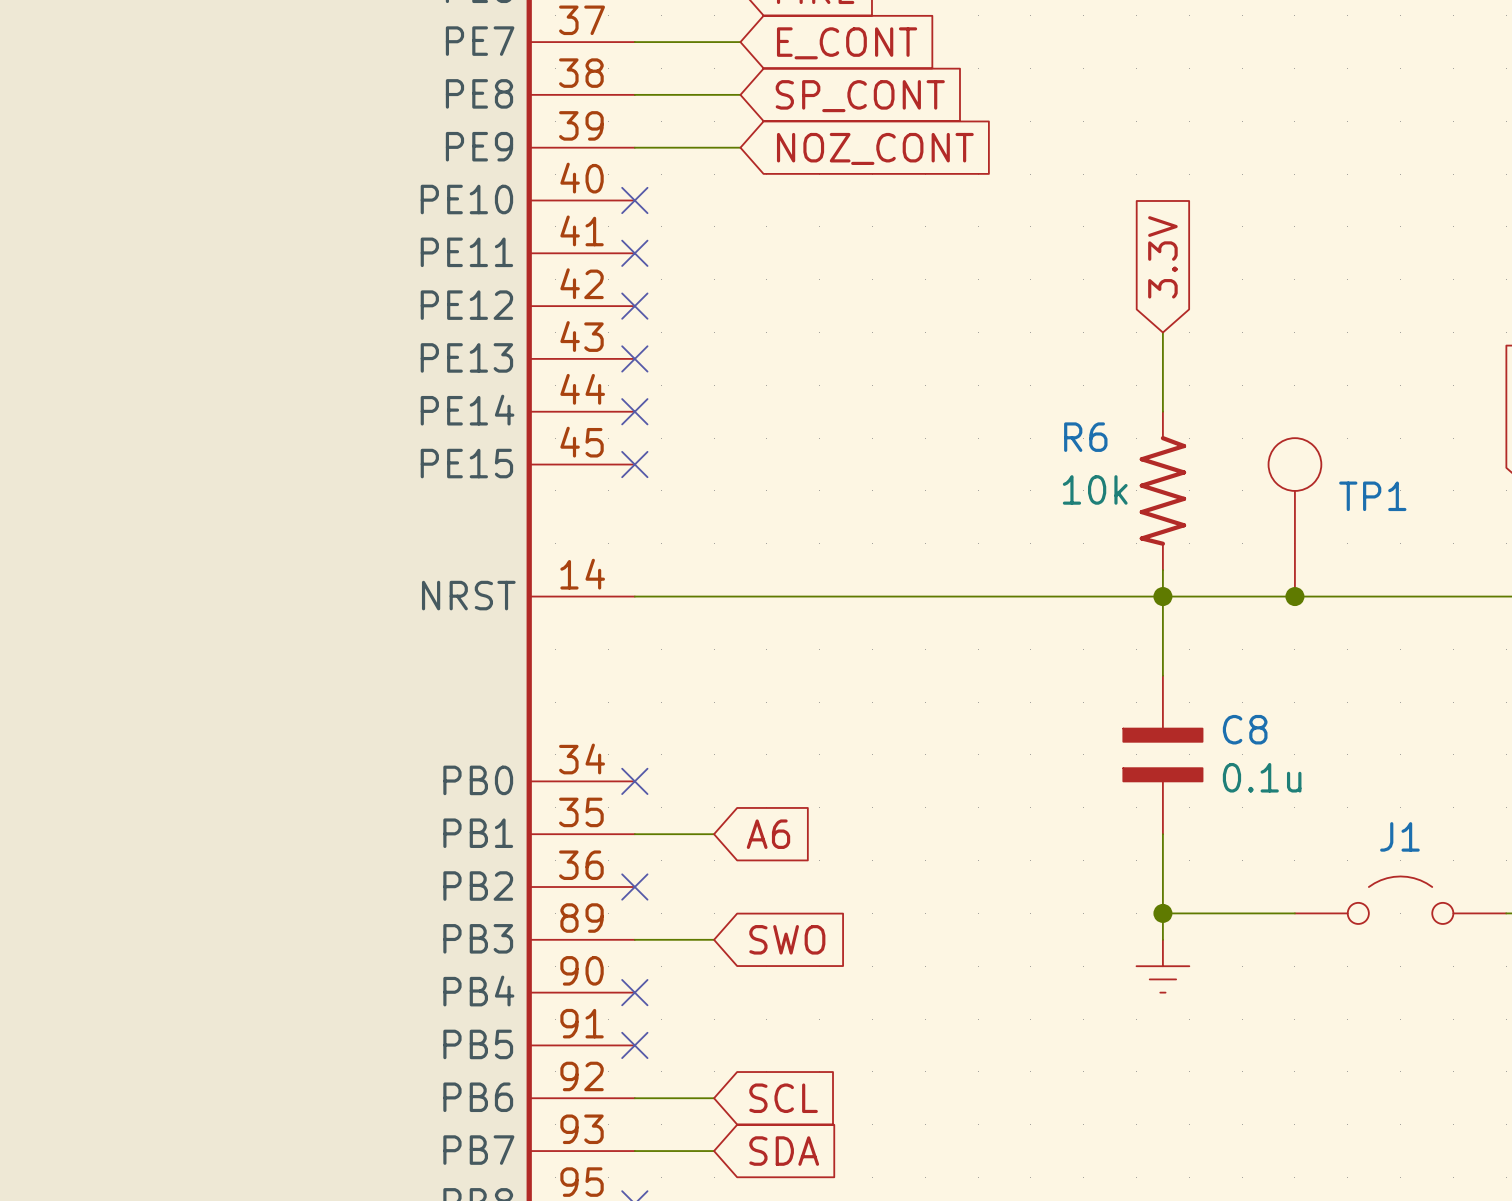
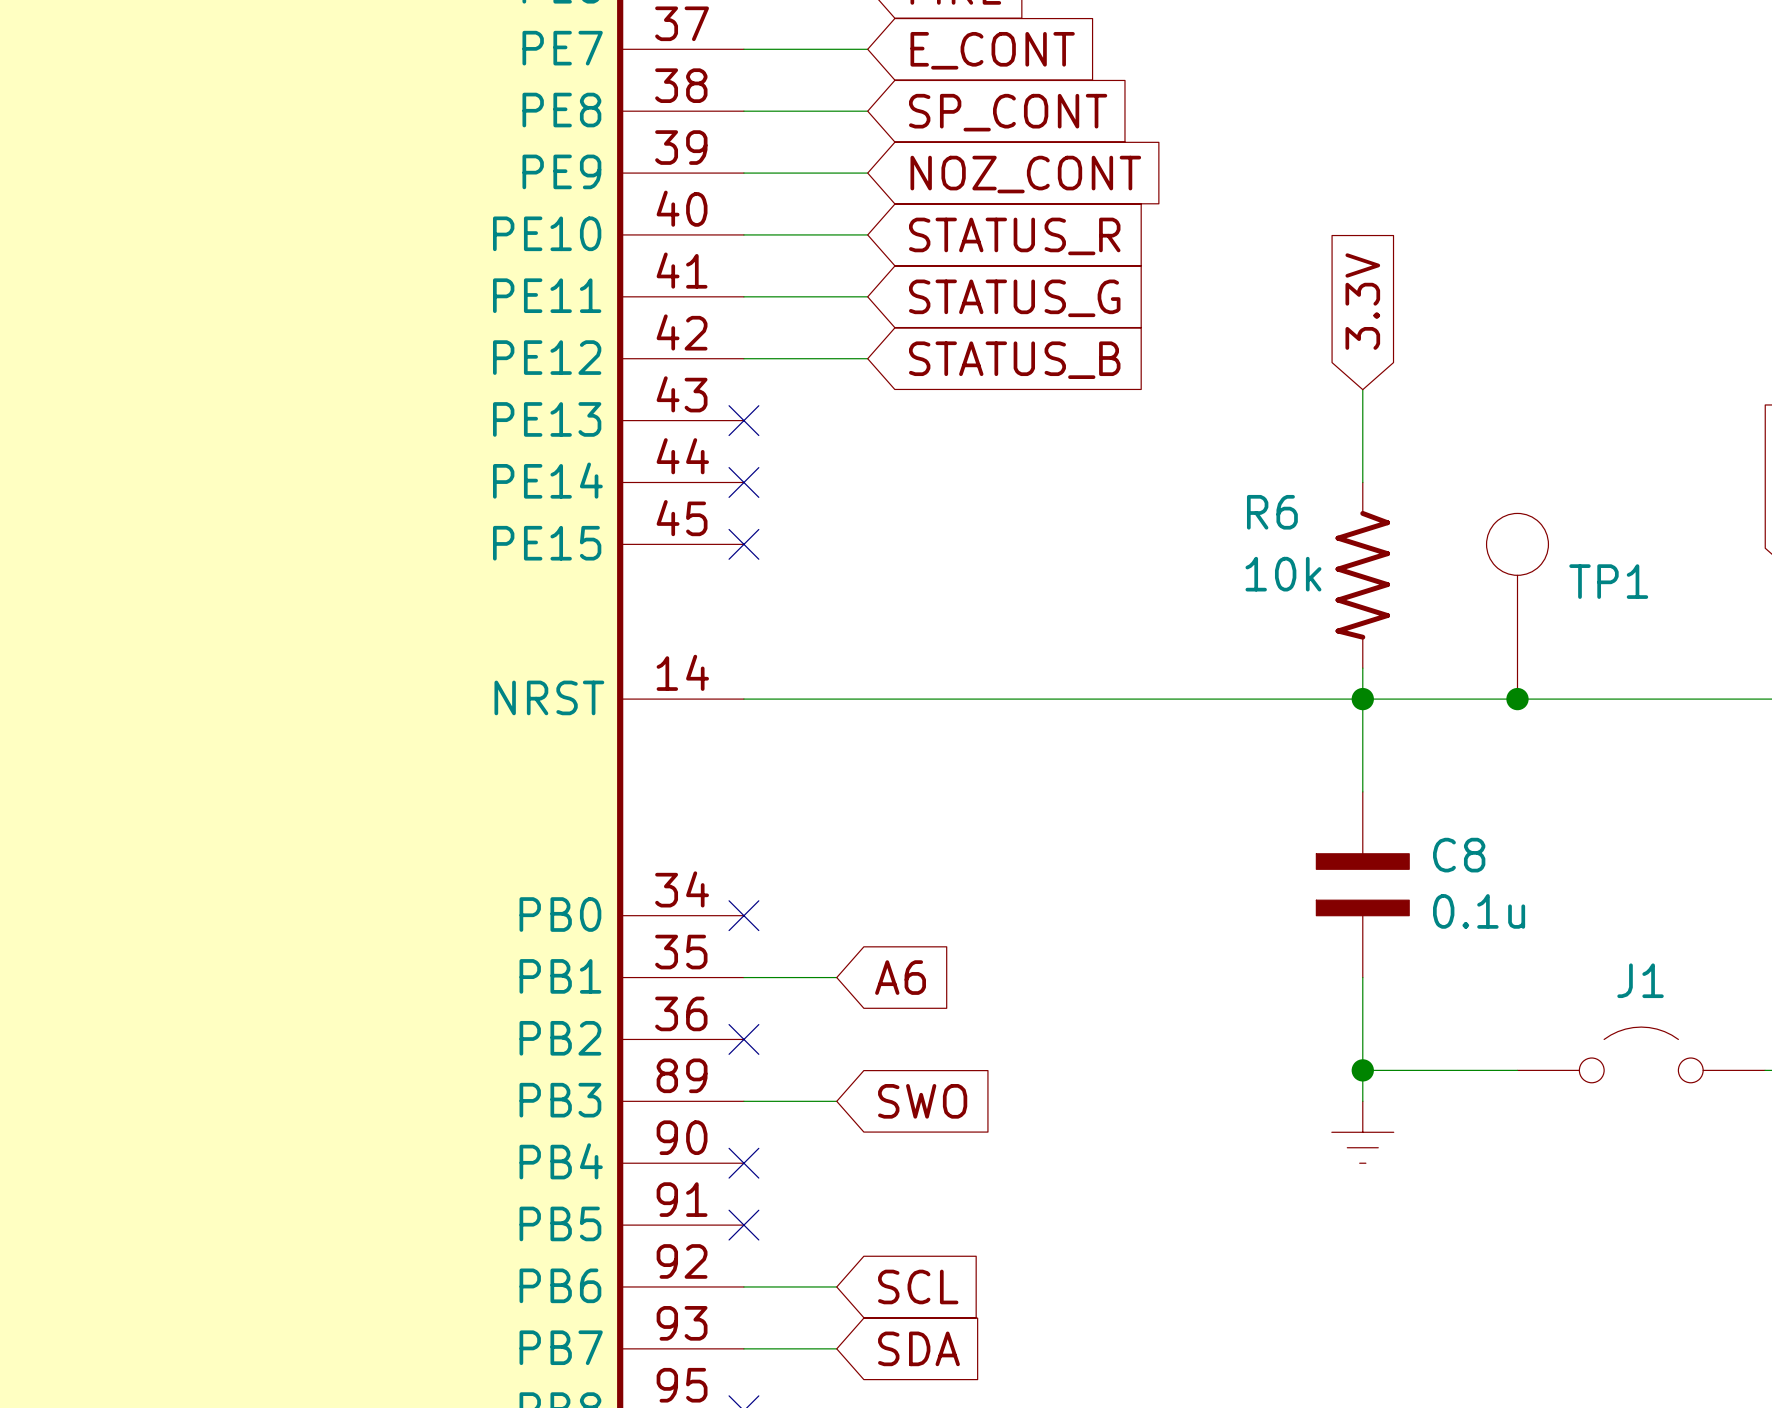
wire: none -> (743, 234) (867, 234)
no-connect mark: (634, 200) -> none
global label: none -> STATUS_R (1014, 236)
wire: none -> (743, 296) (867, 296)
no-connect mark: (634, 253) -> none
global label: none -> STATUS_G (1014, 298)
wire: none -> (743, 358) (867, 358)
no-connect mark: (634, 306) -> none
global label: none -> STATUS_B (1014, 360)

